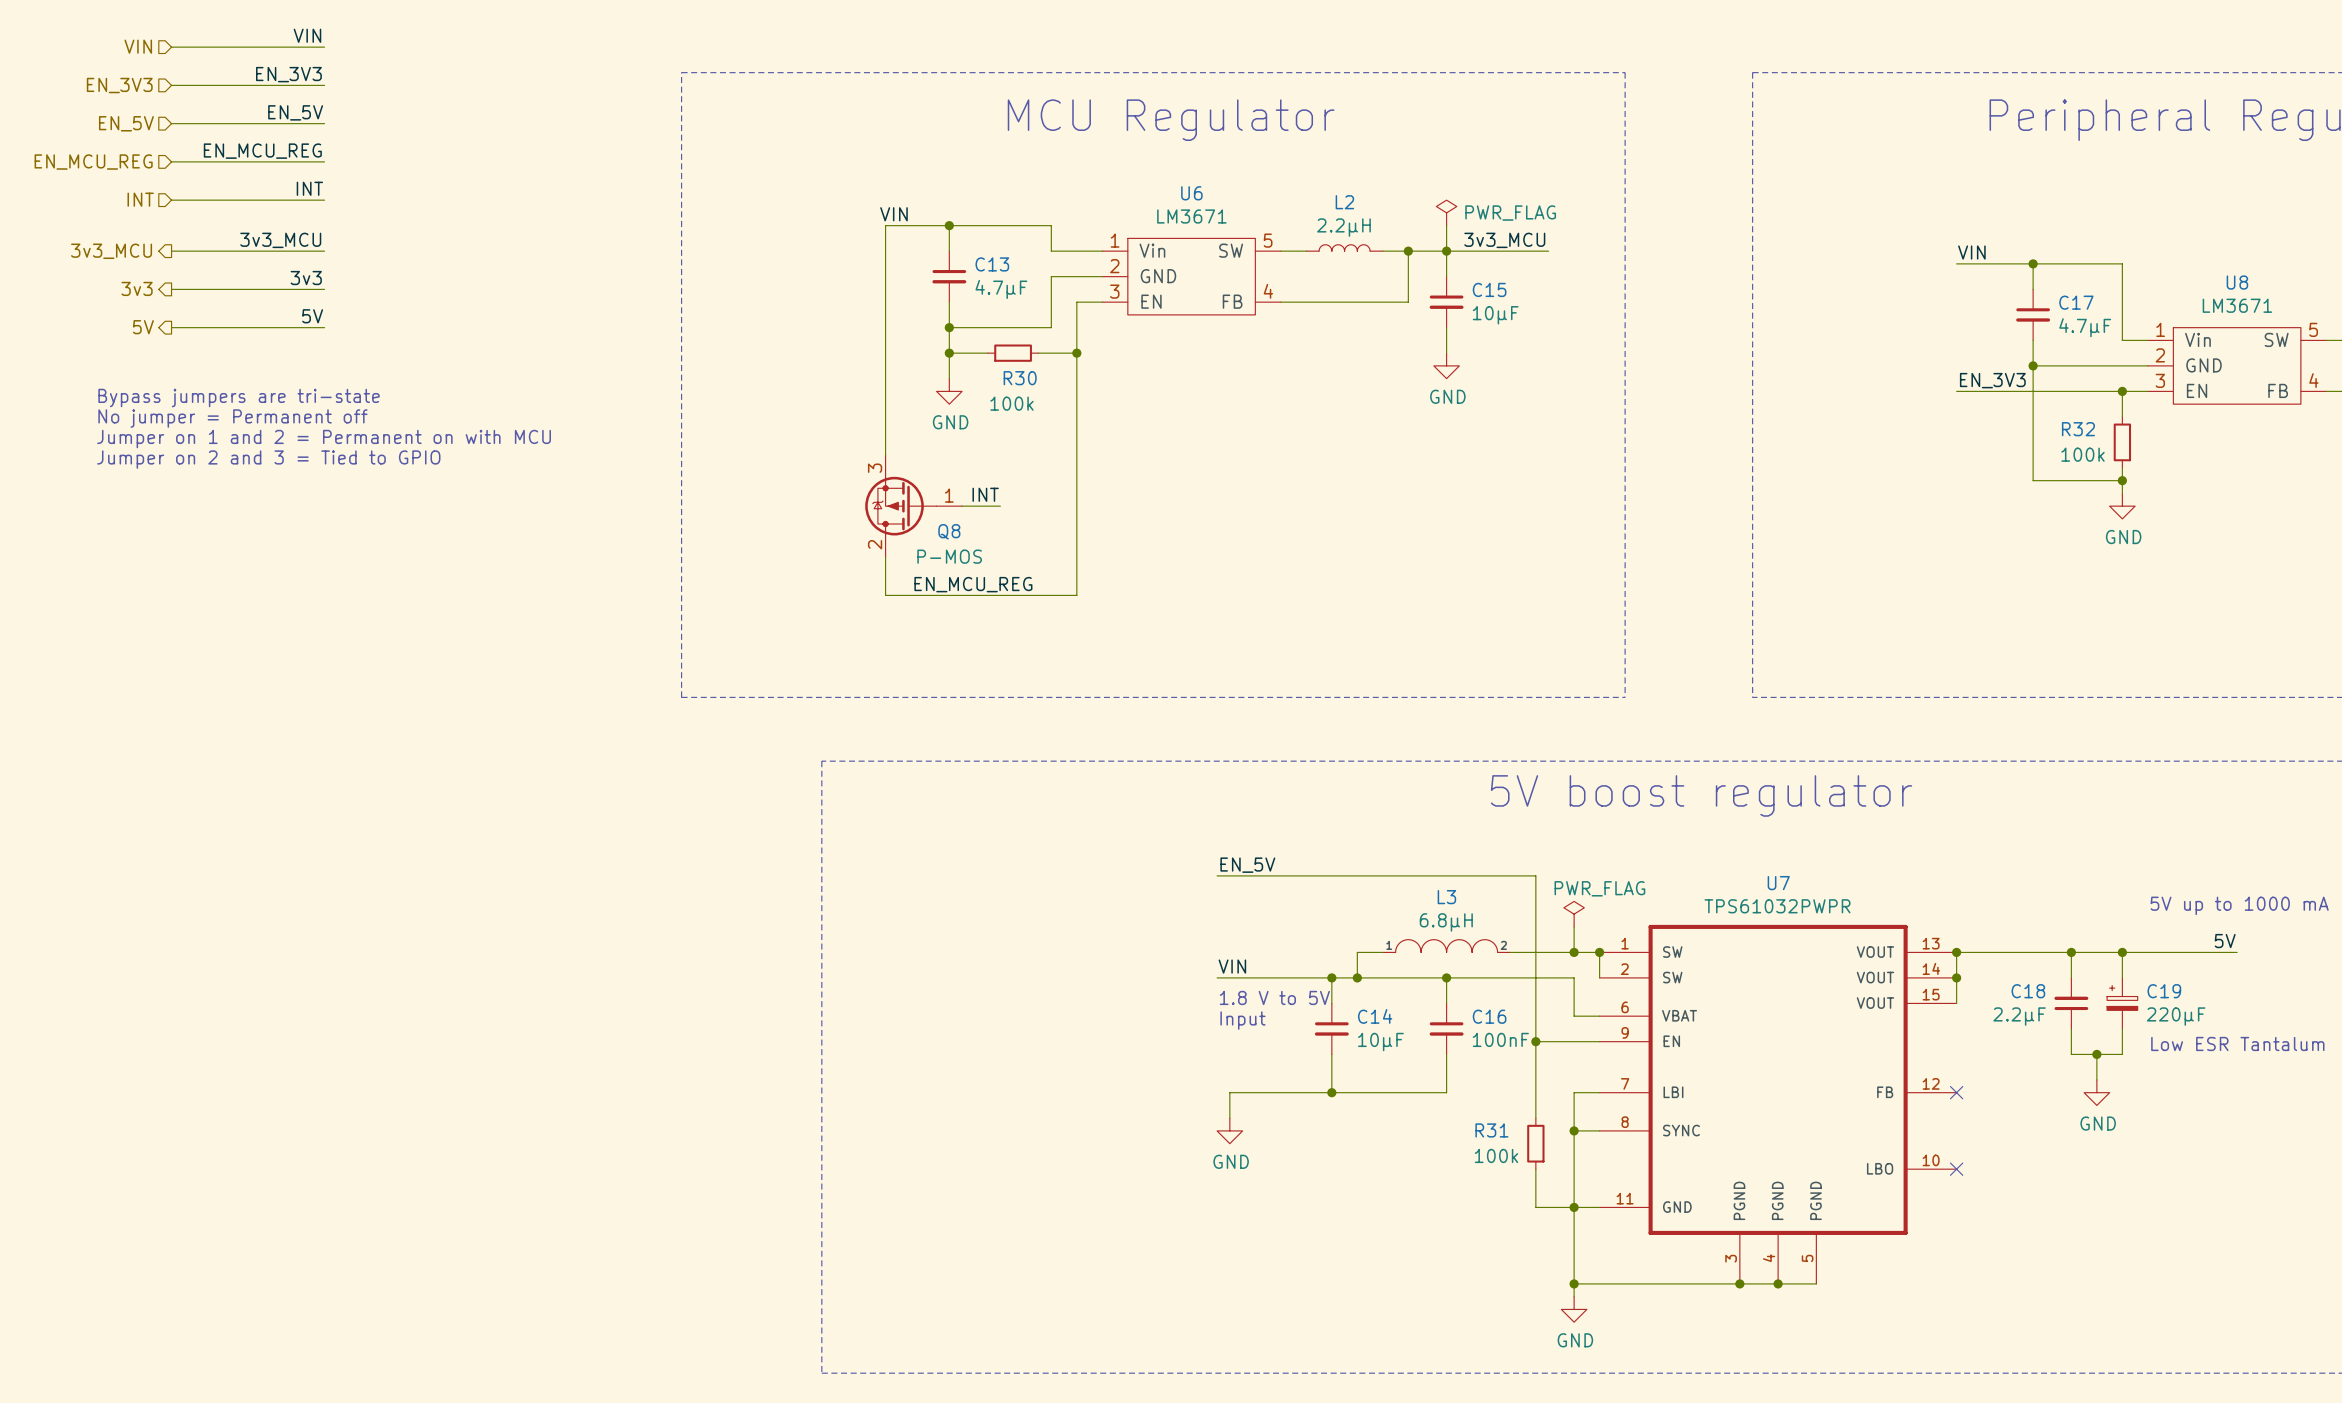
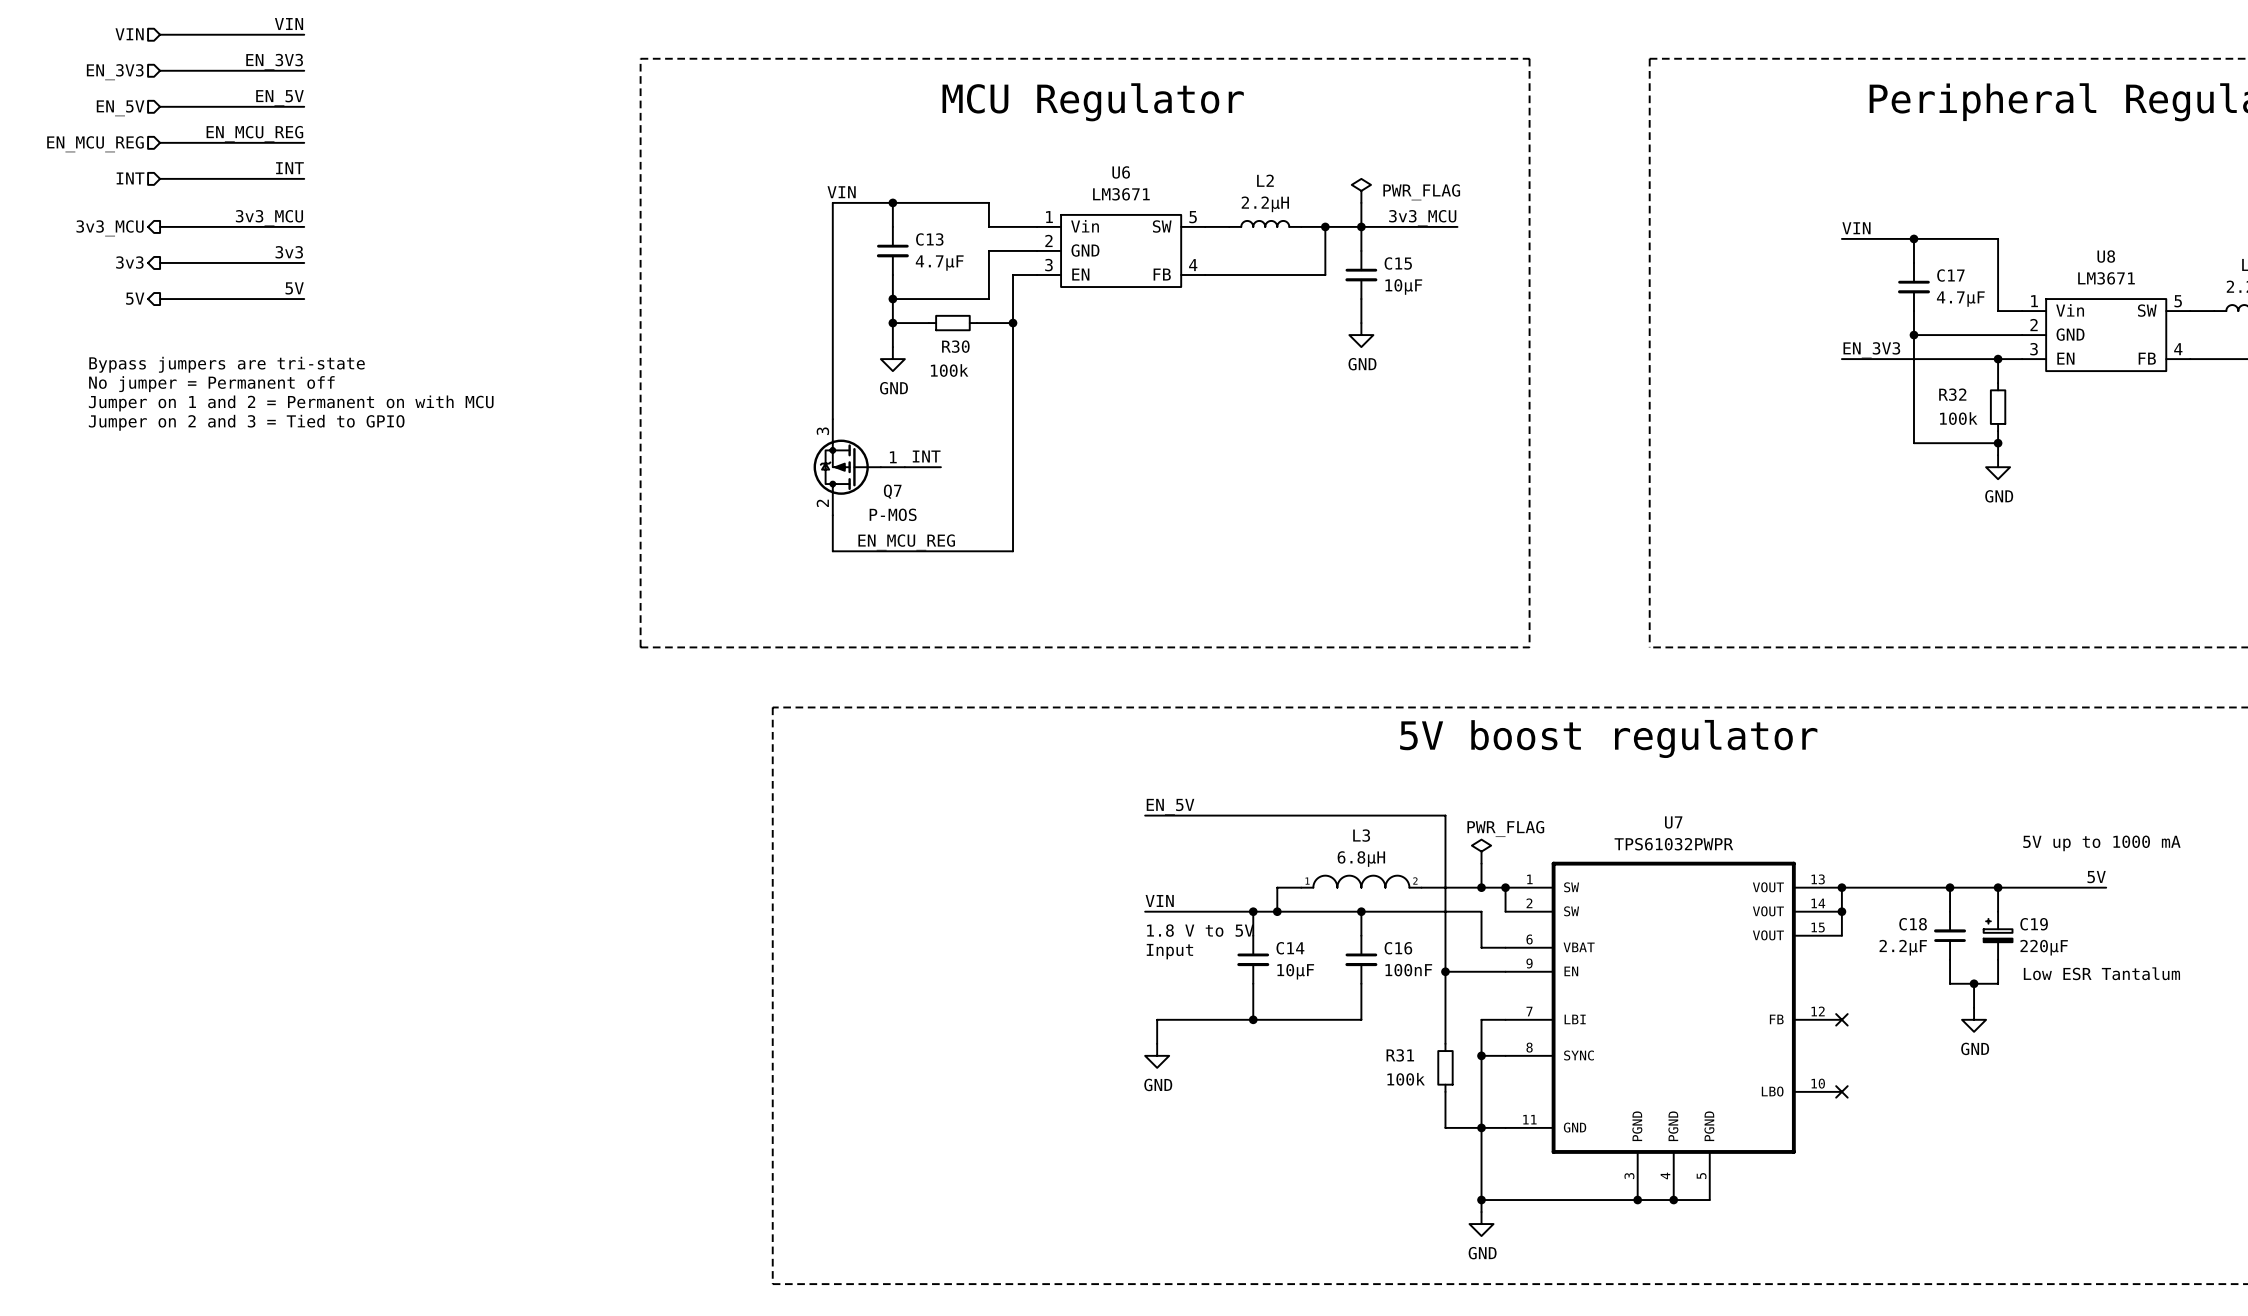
Q8 name: Q8 (949, 531) -> Q7 (892, 491)

